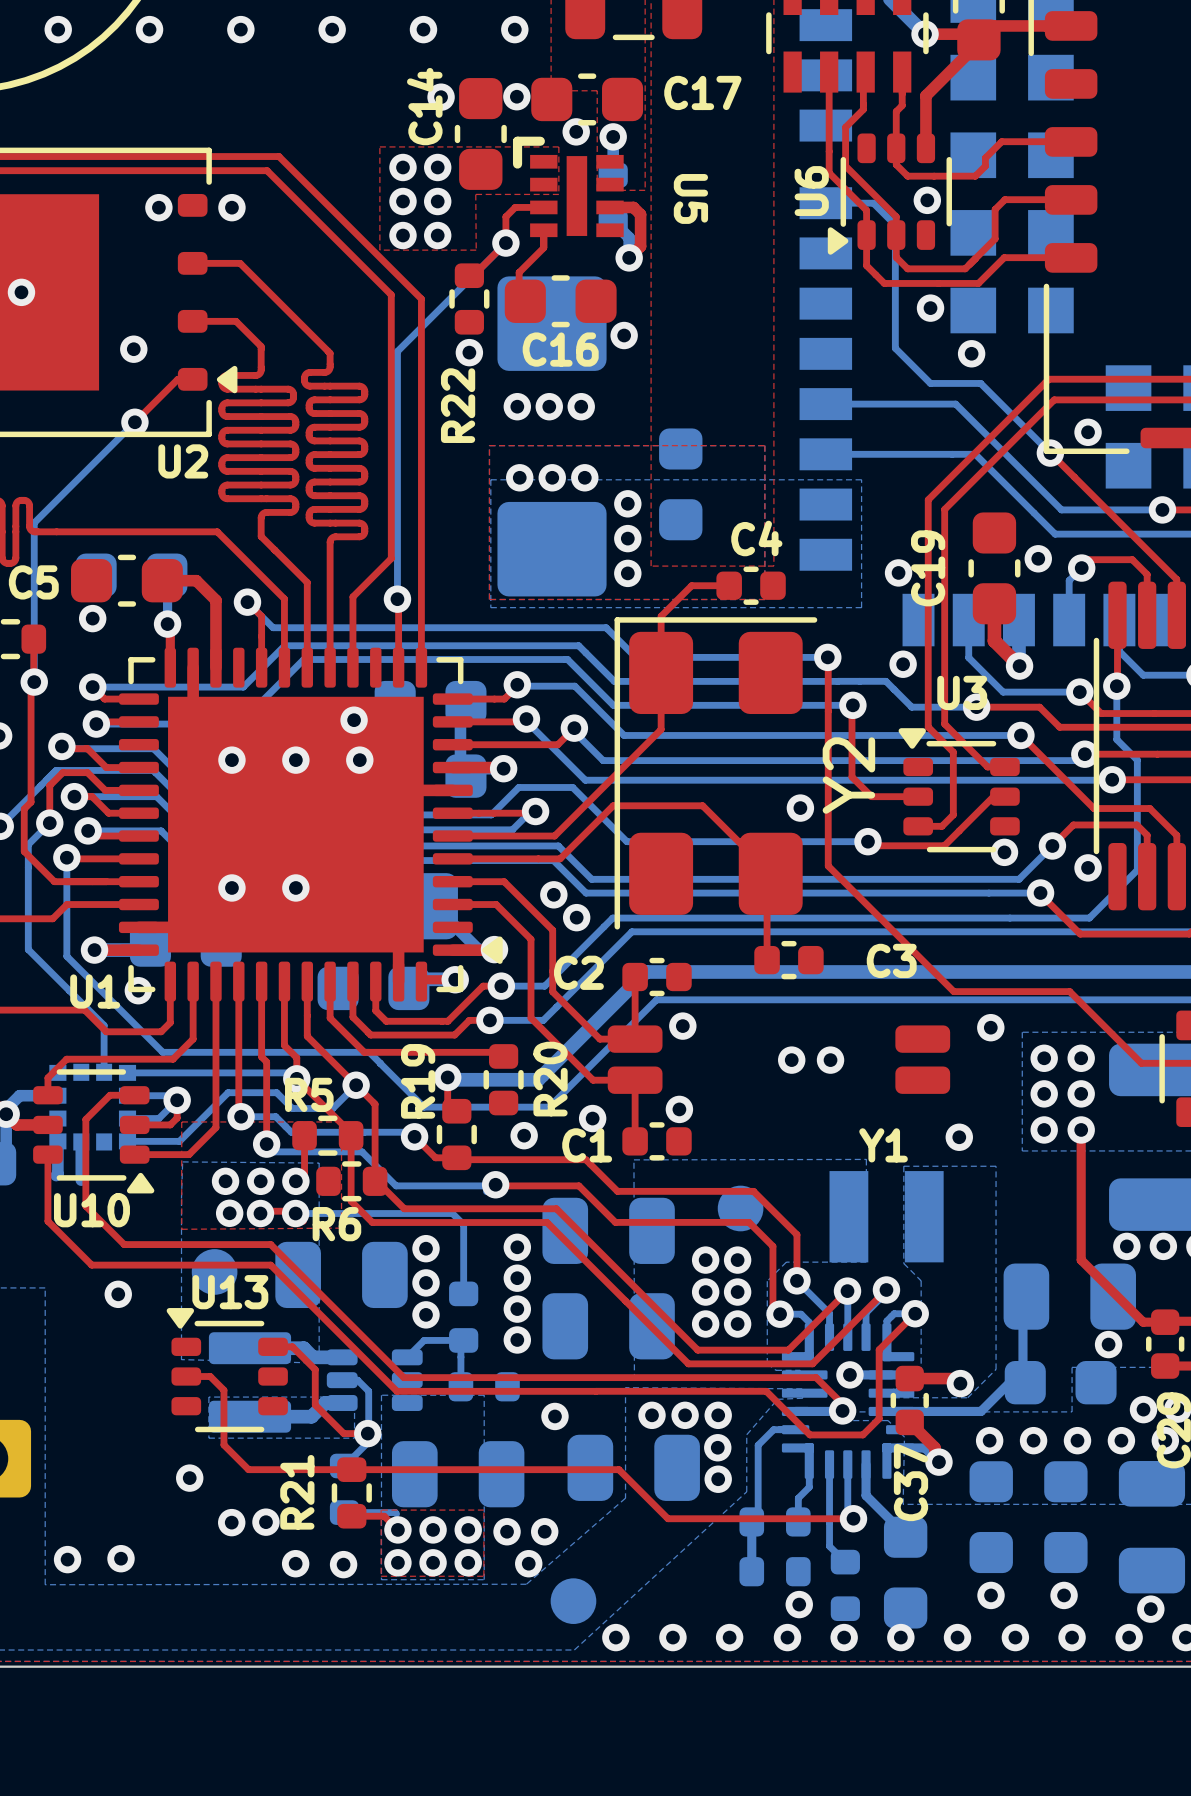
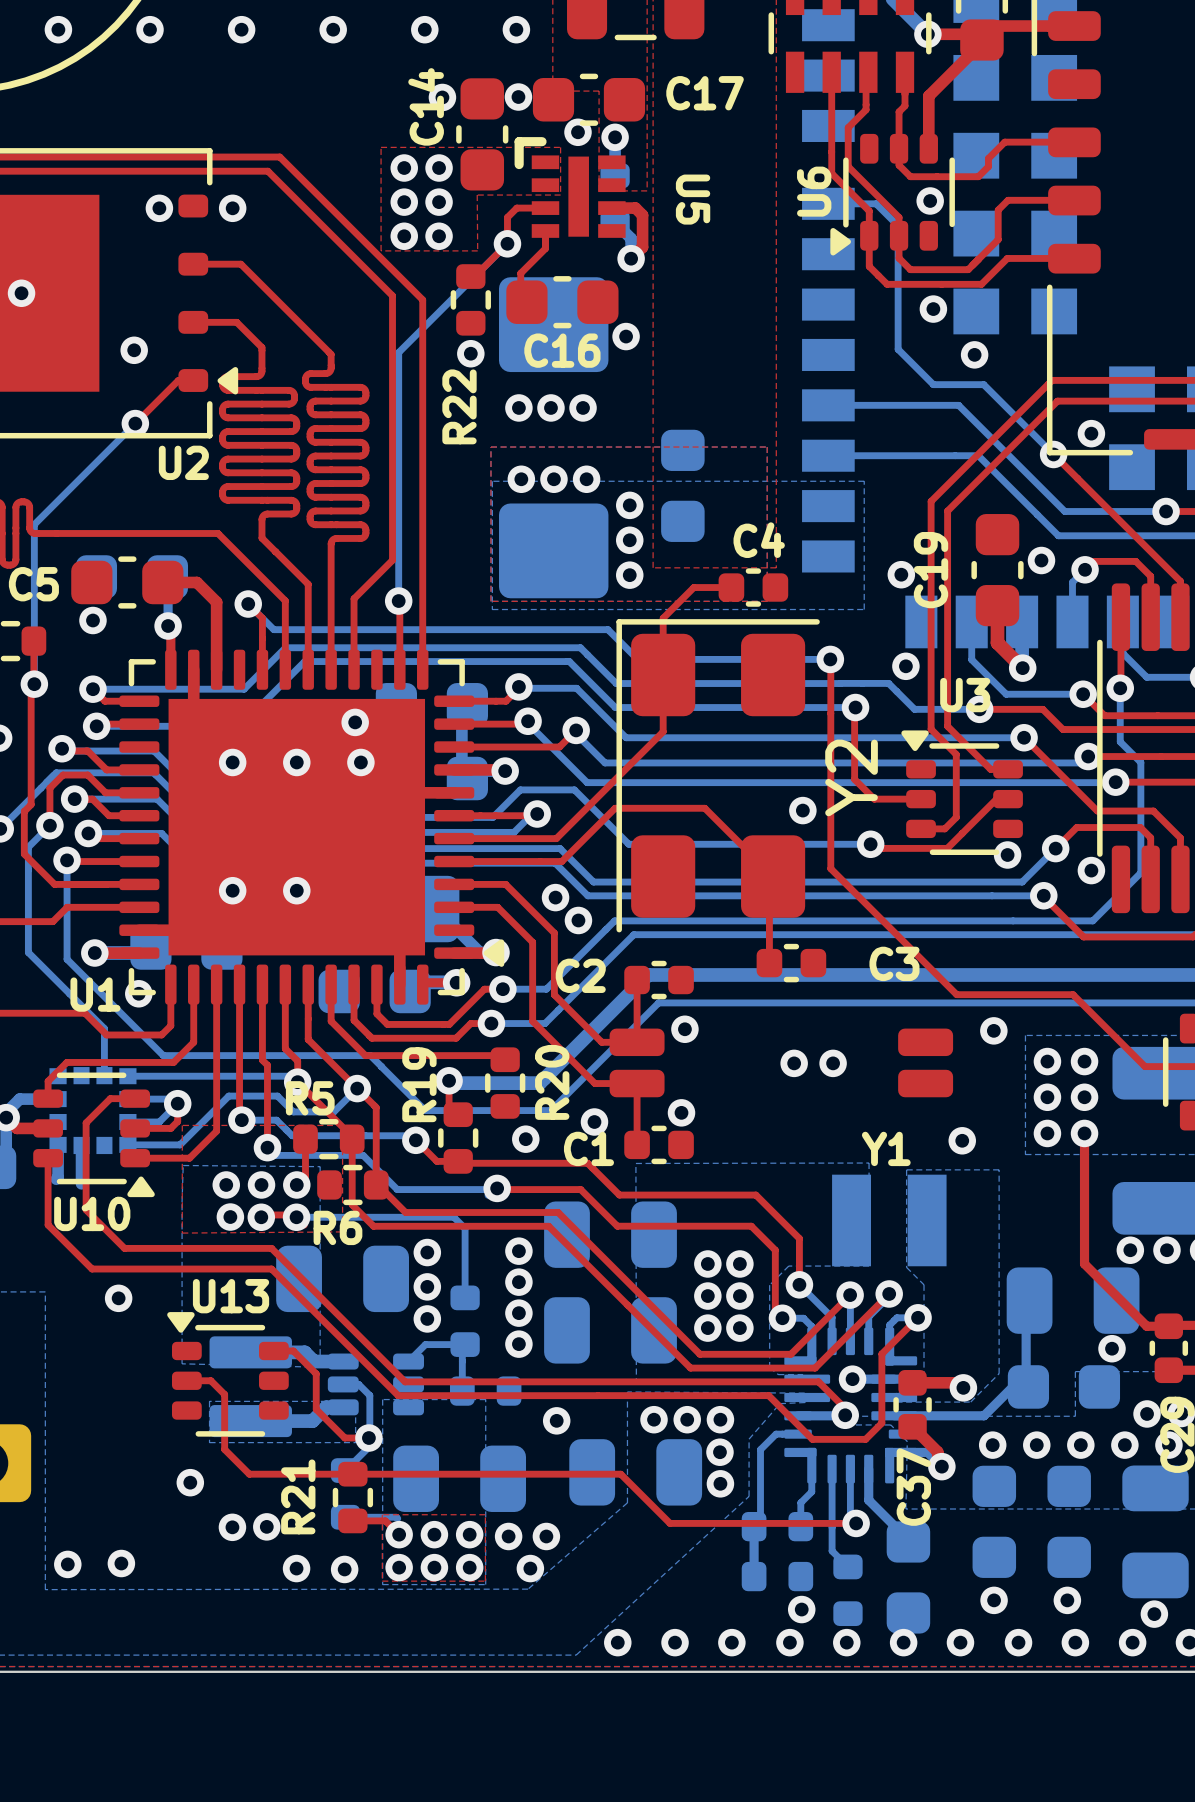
part: (740, 1208) -> none
part: (214, 1271) -> none
part: (573, 1601) -> none

